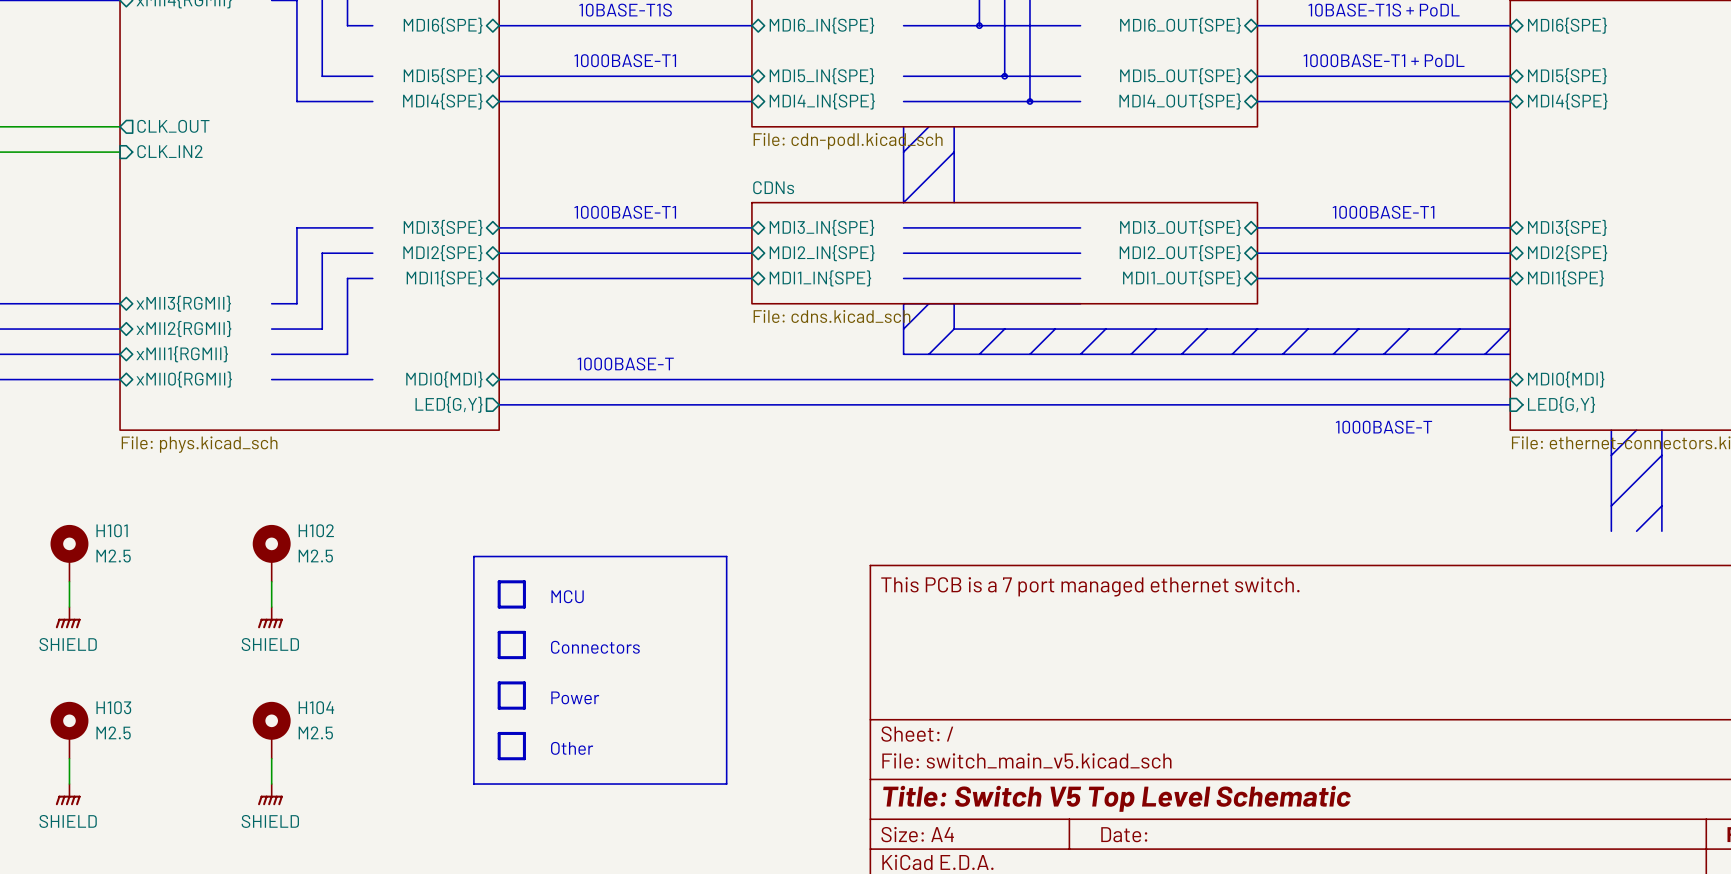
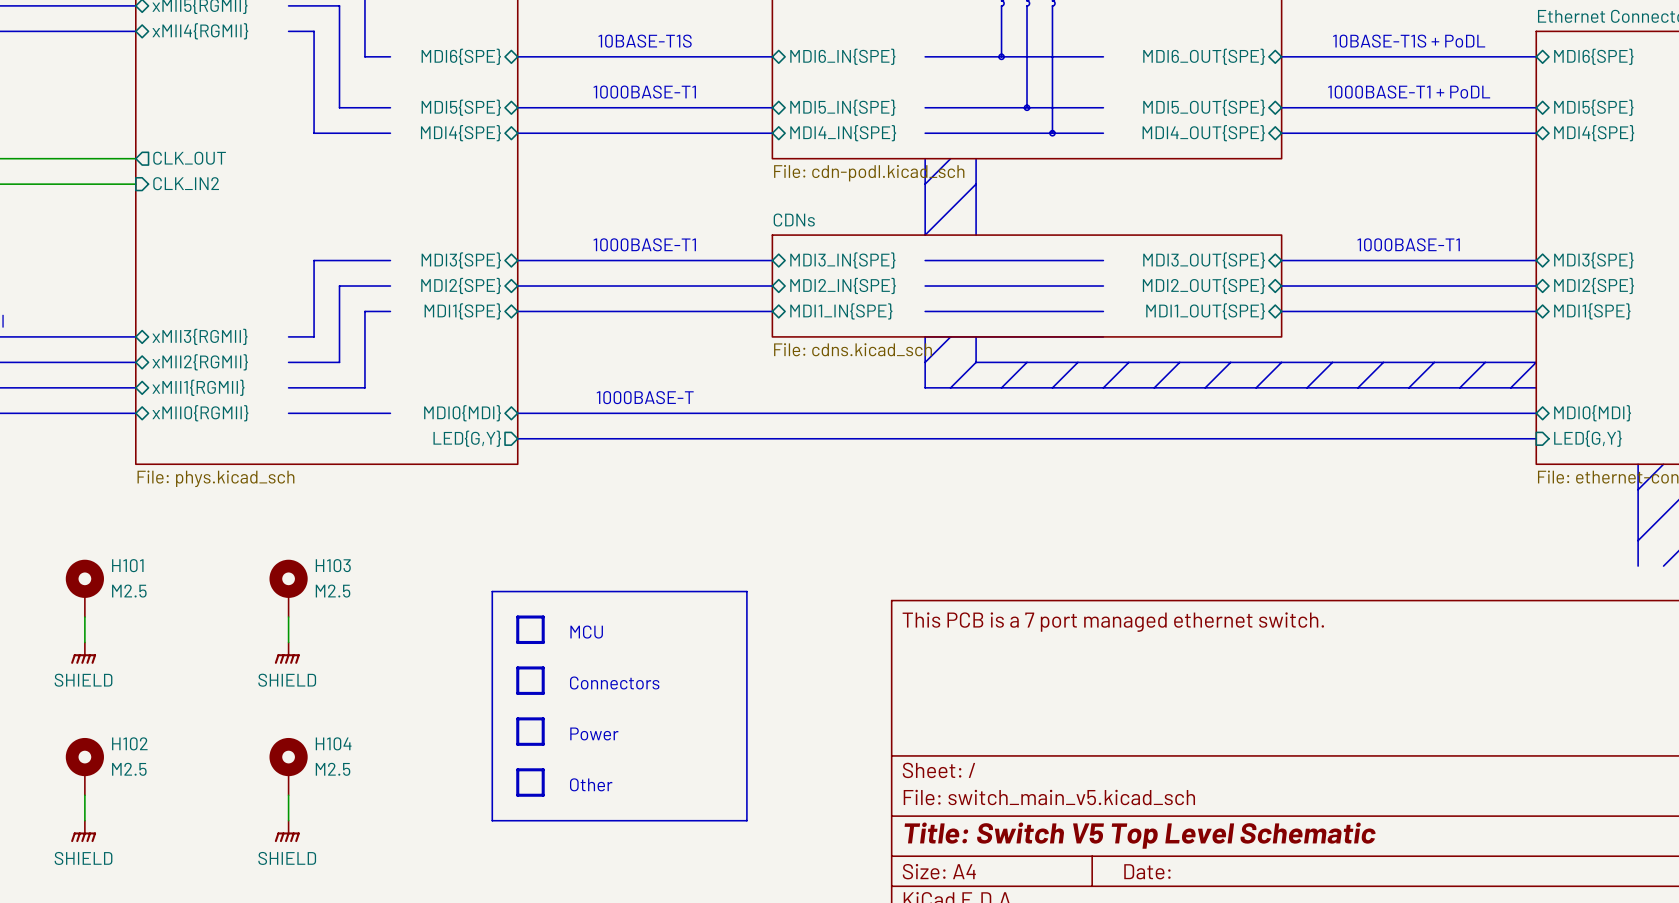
text: 1000BASE-T (1383, 427) -> none
H102 name: H102 (316, 530) -> H103 (333, 565)
H103 name: H103 (113, 707) -> H102 (129, 743)

